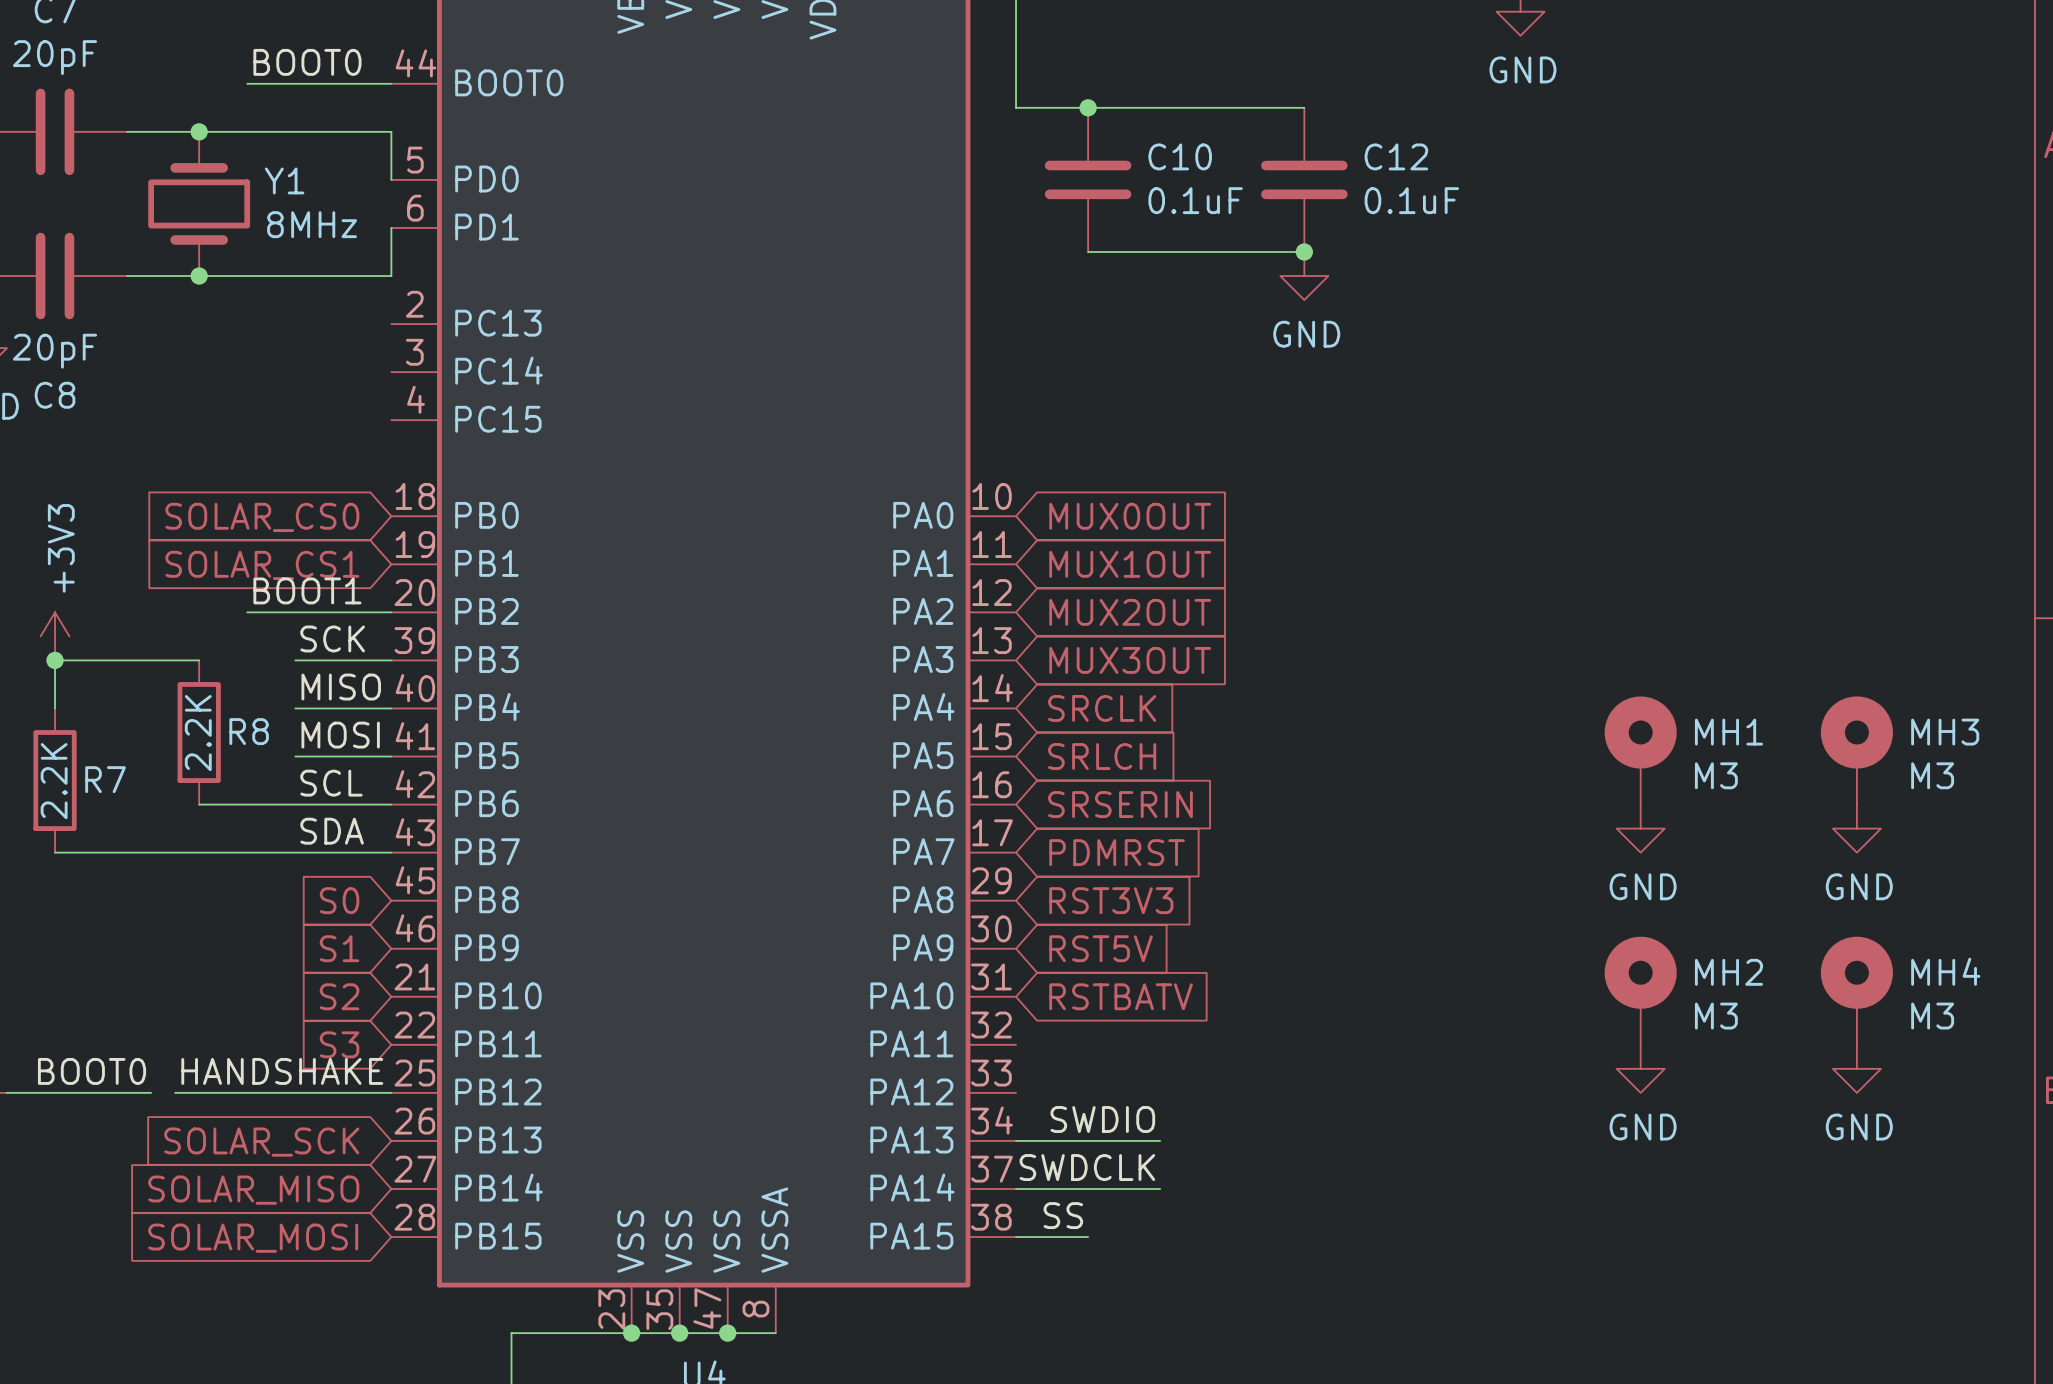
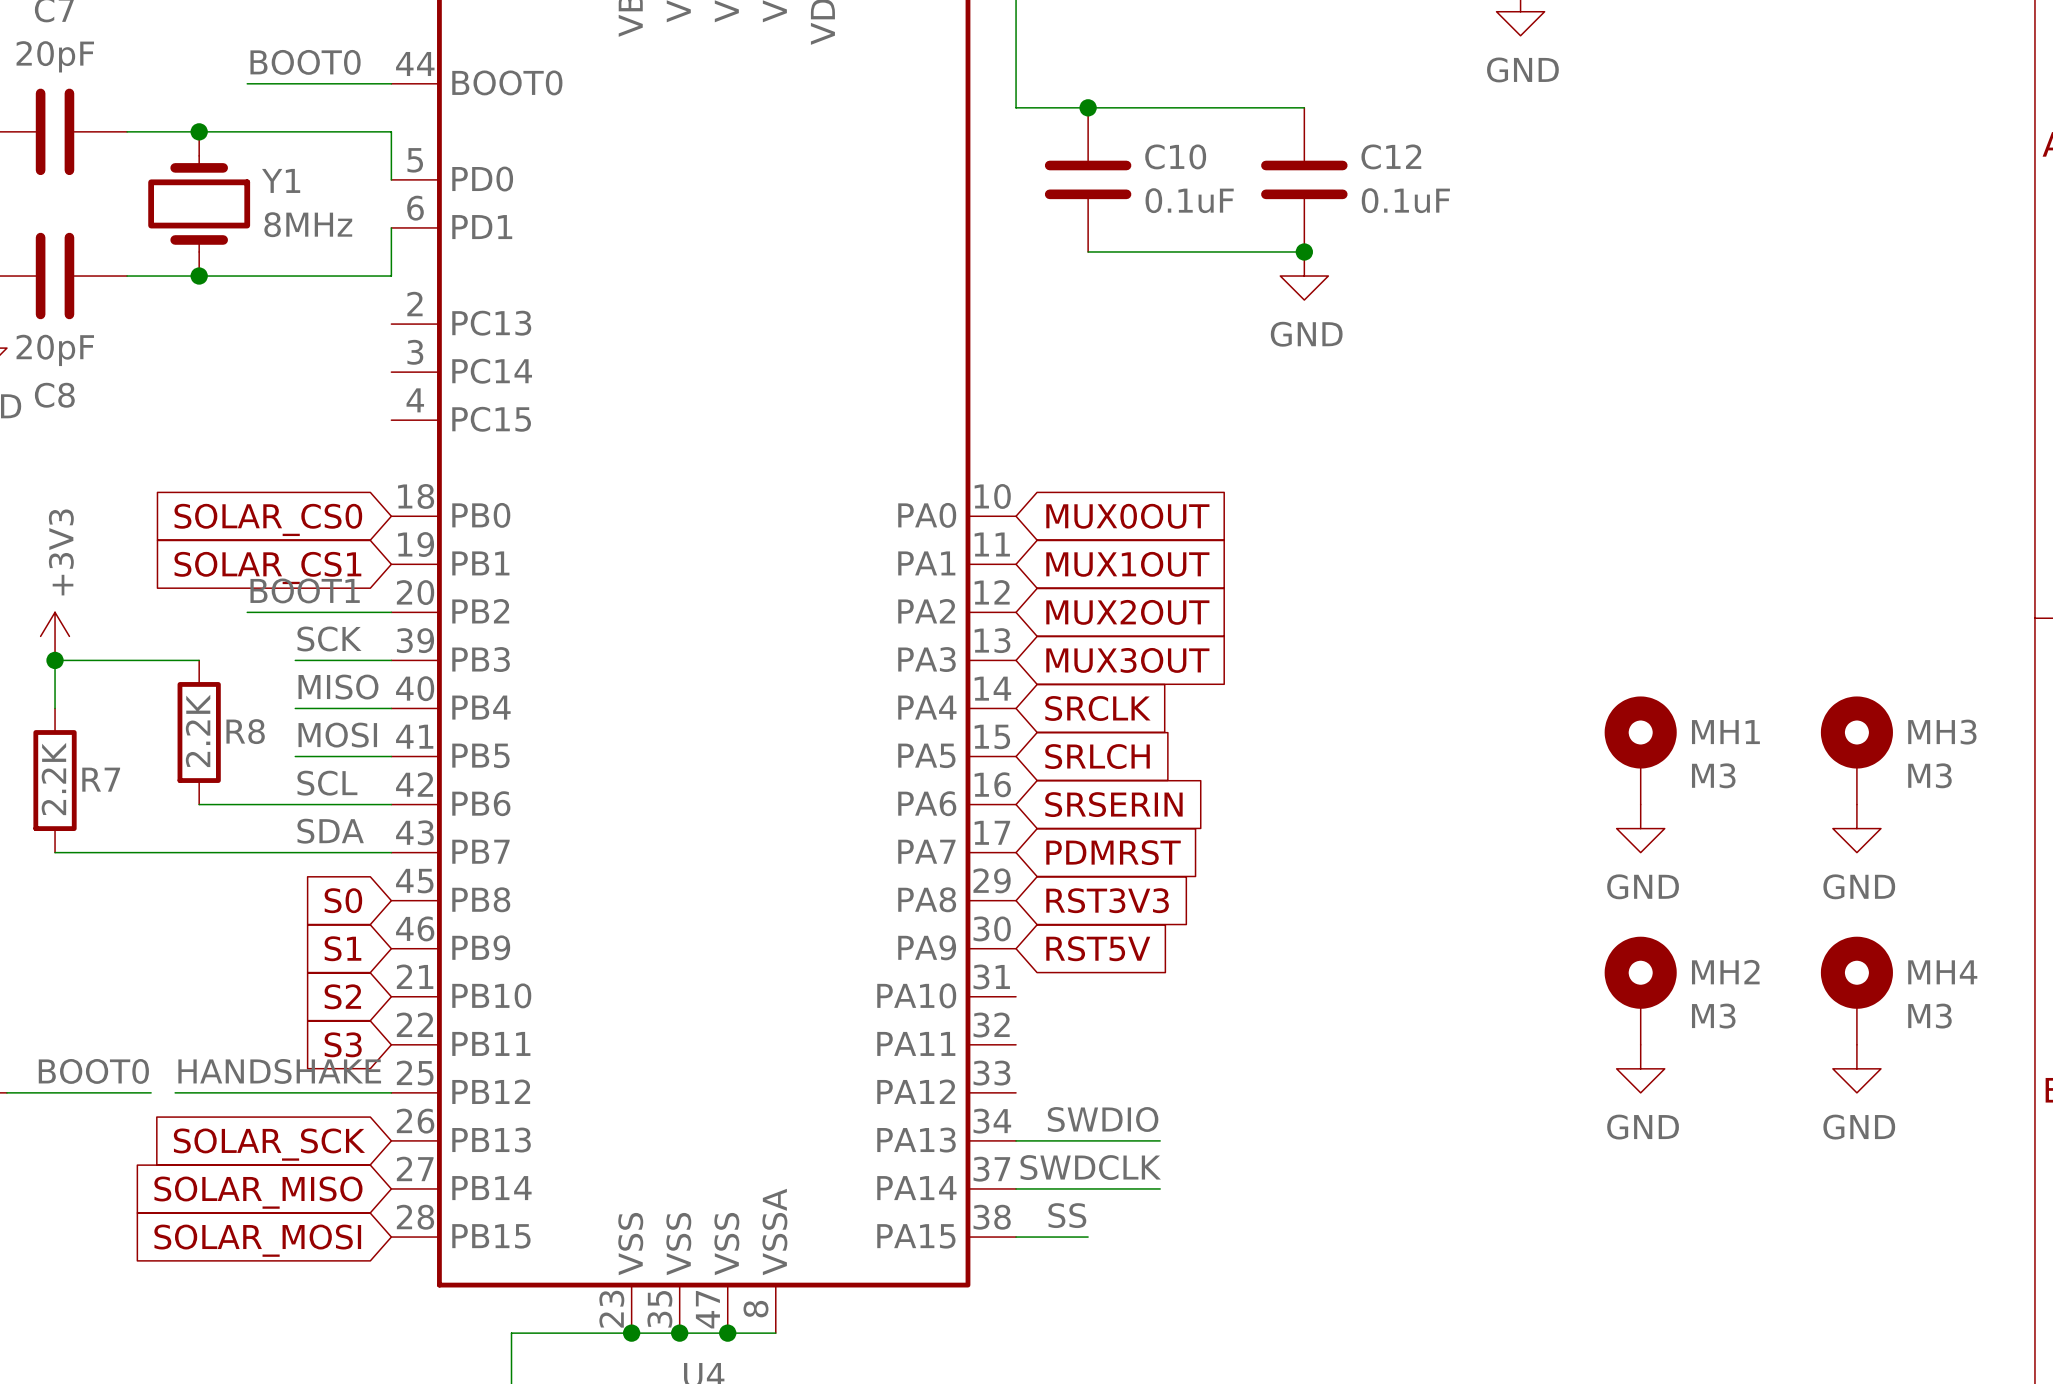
global label: RSTBATV (1121, 996) -> none

